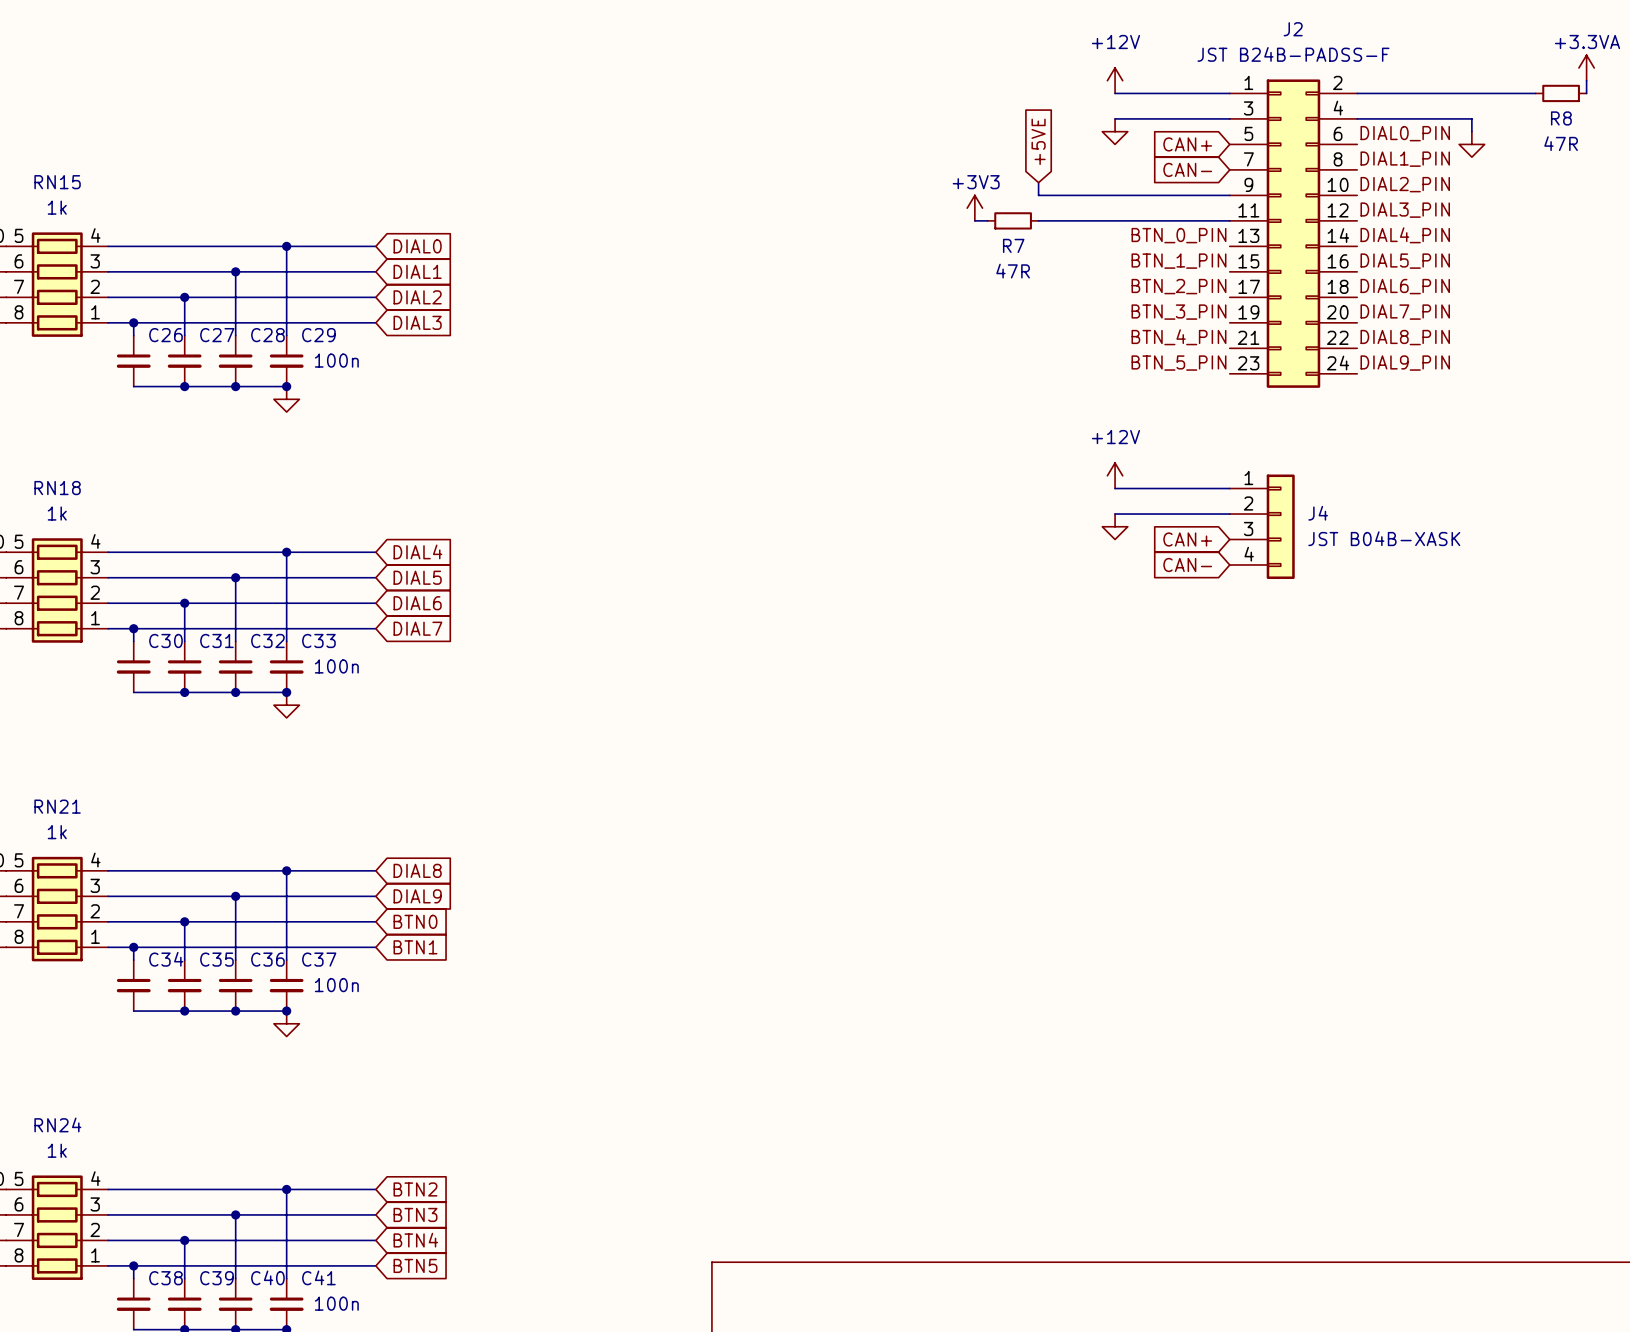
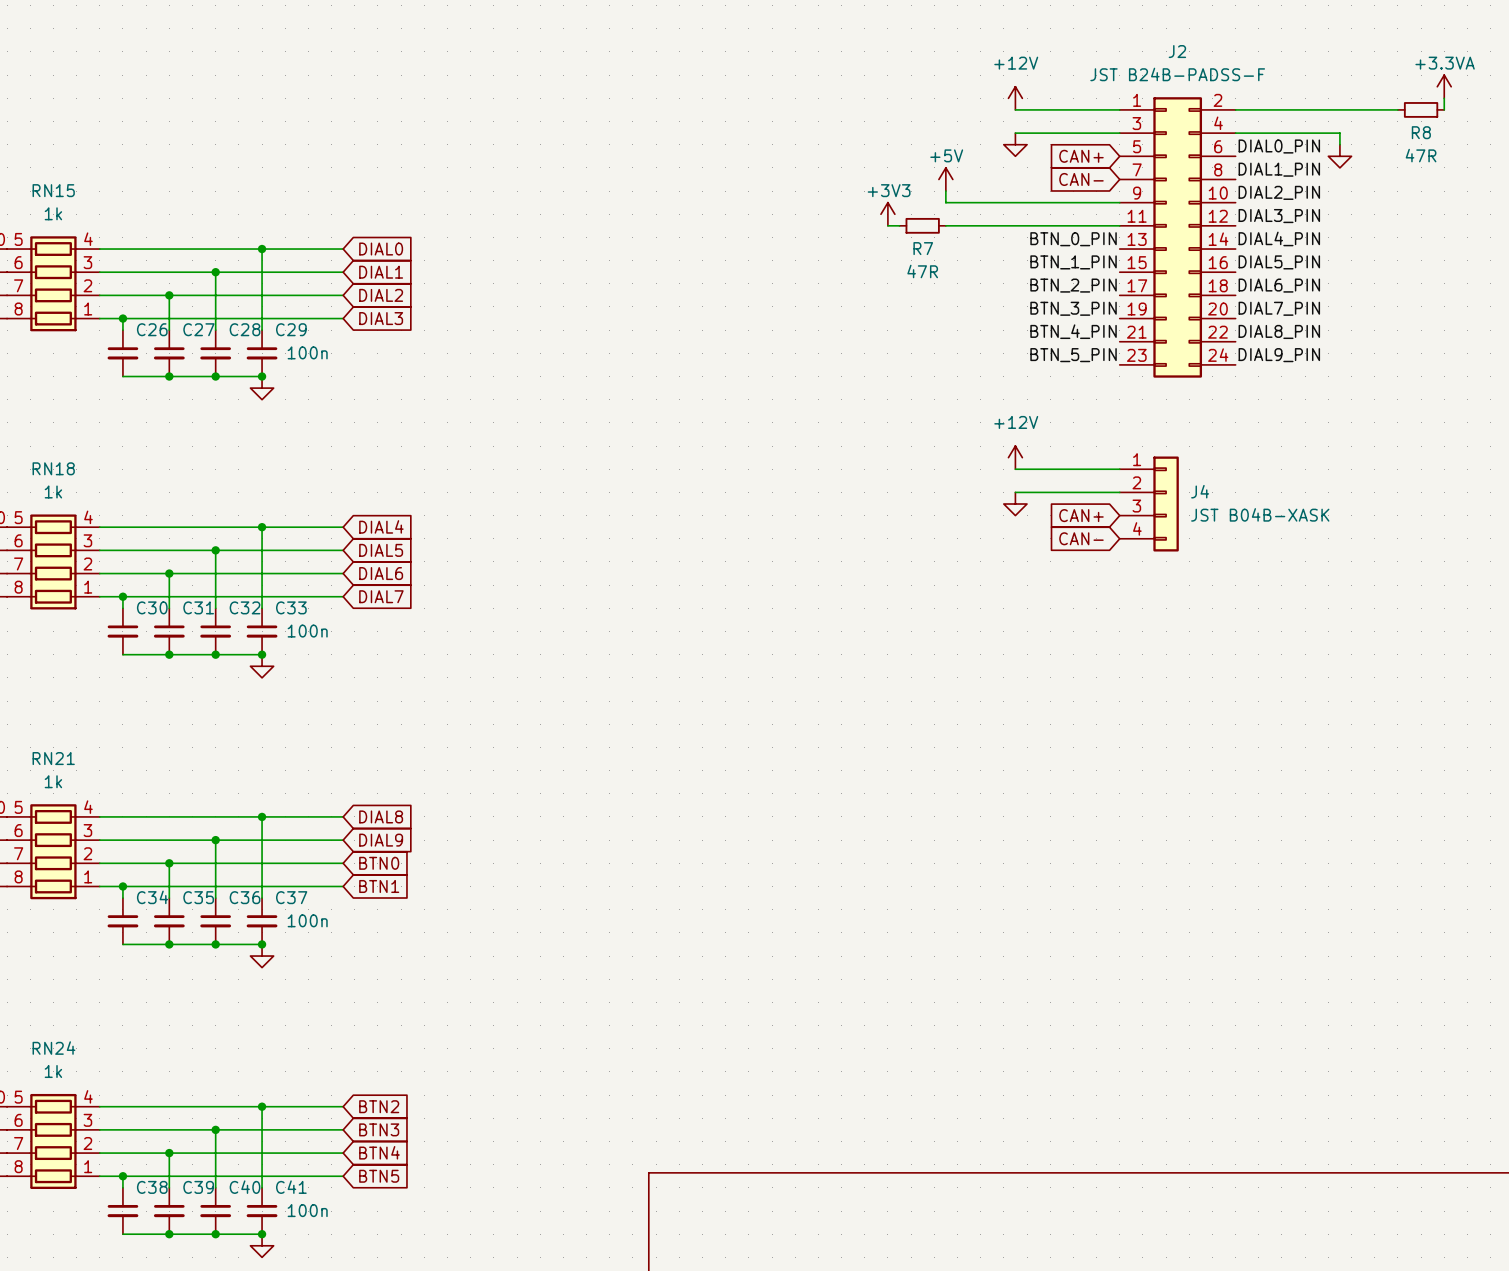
global label: +5VE (1038, 141) -> none
power symbol: none -> +5V (945, 179)

